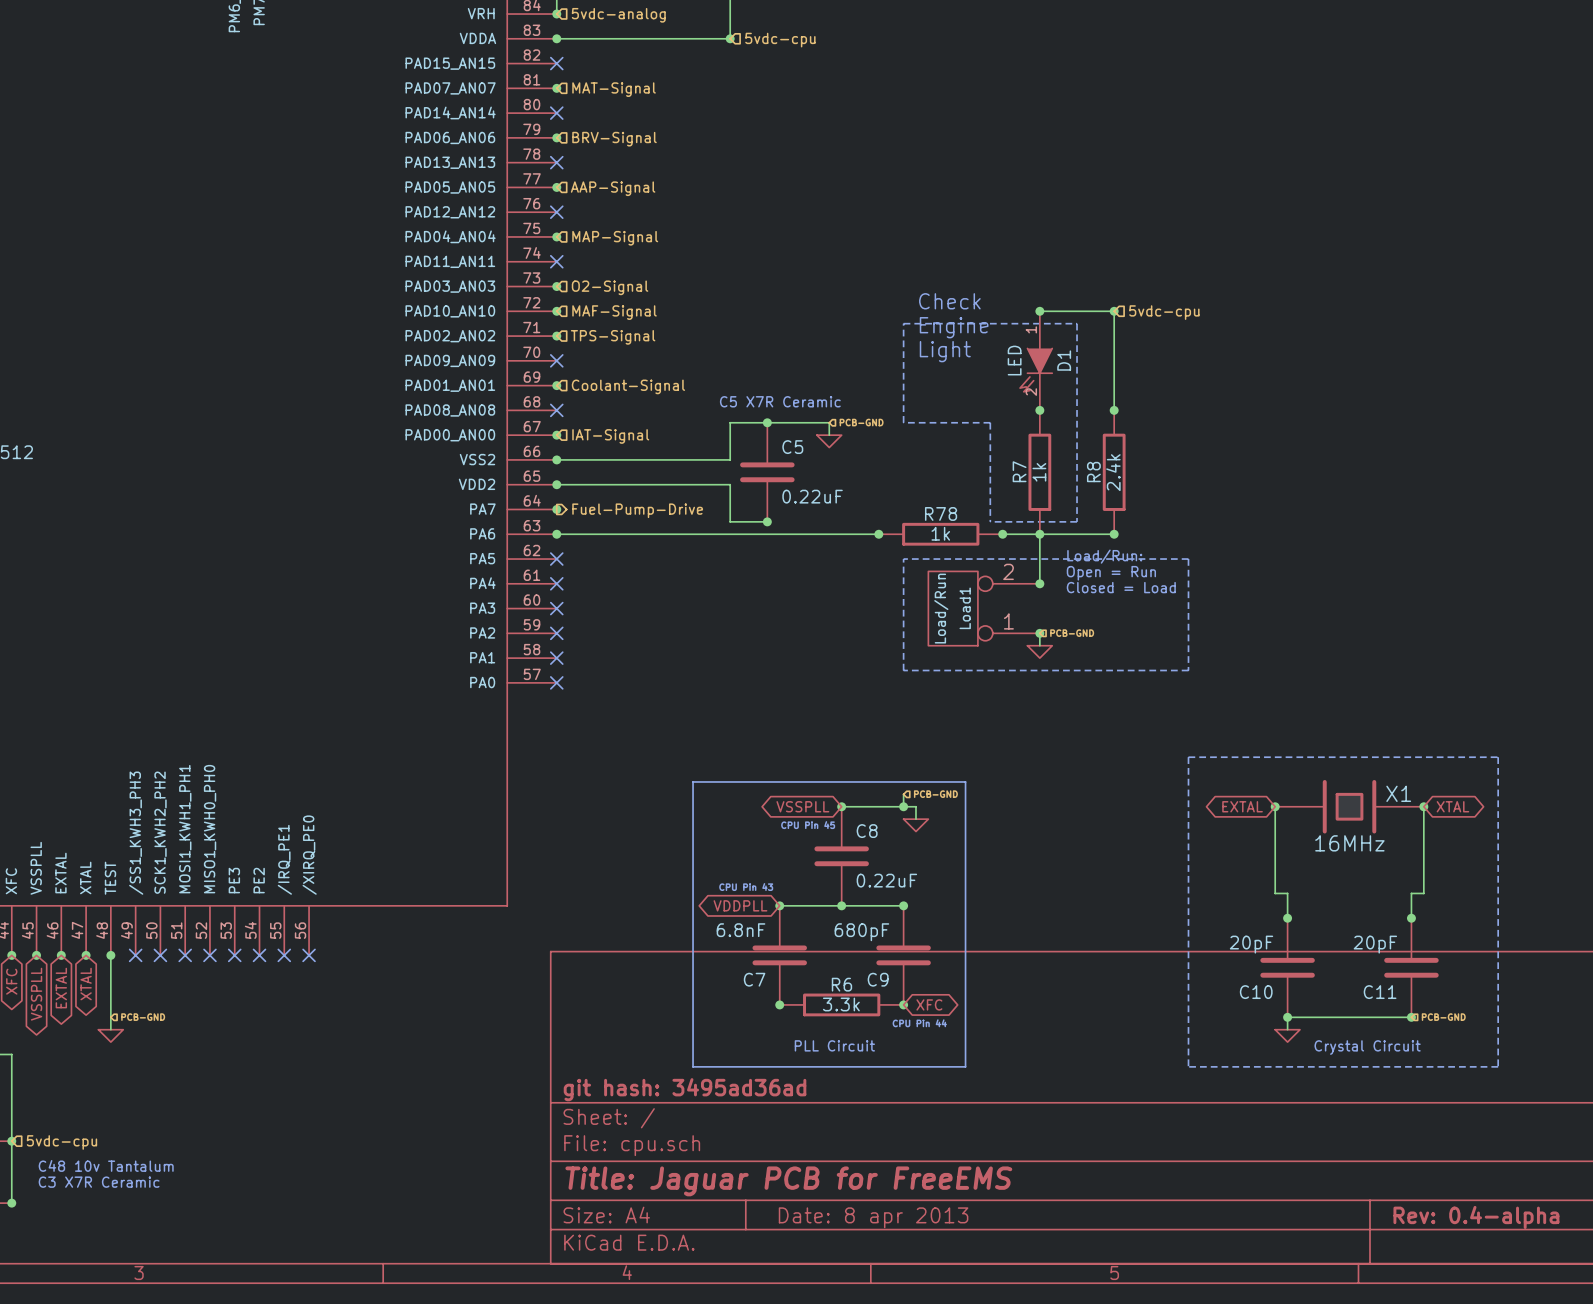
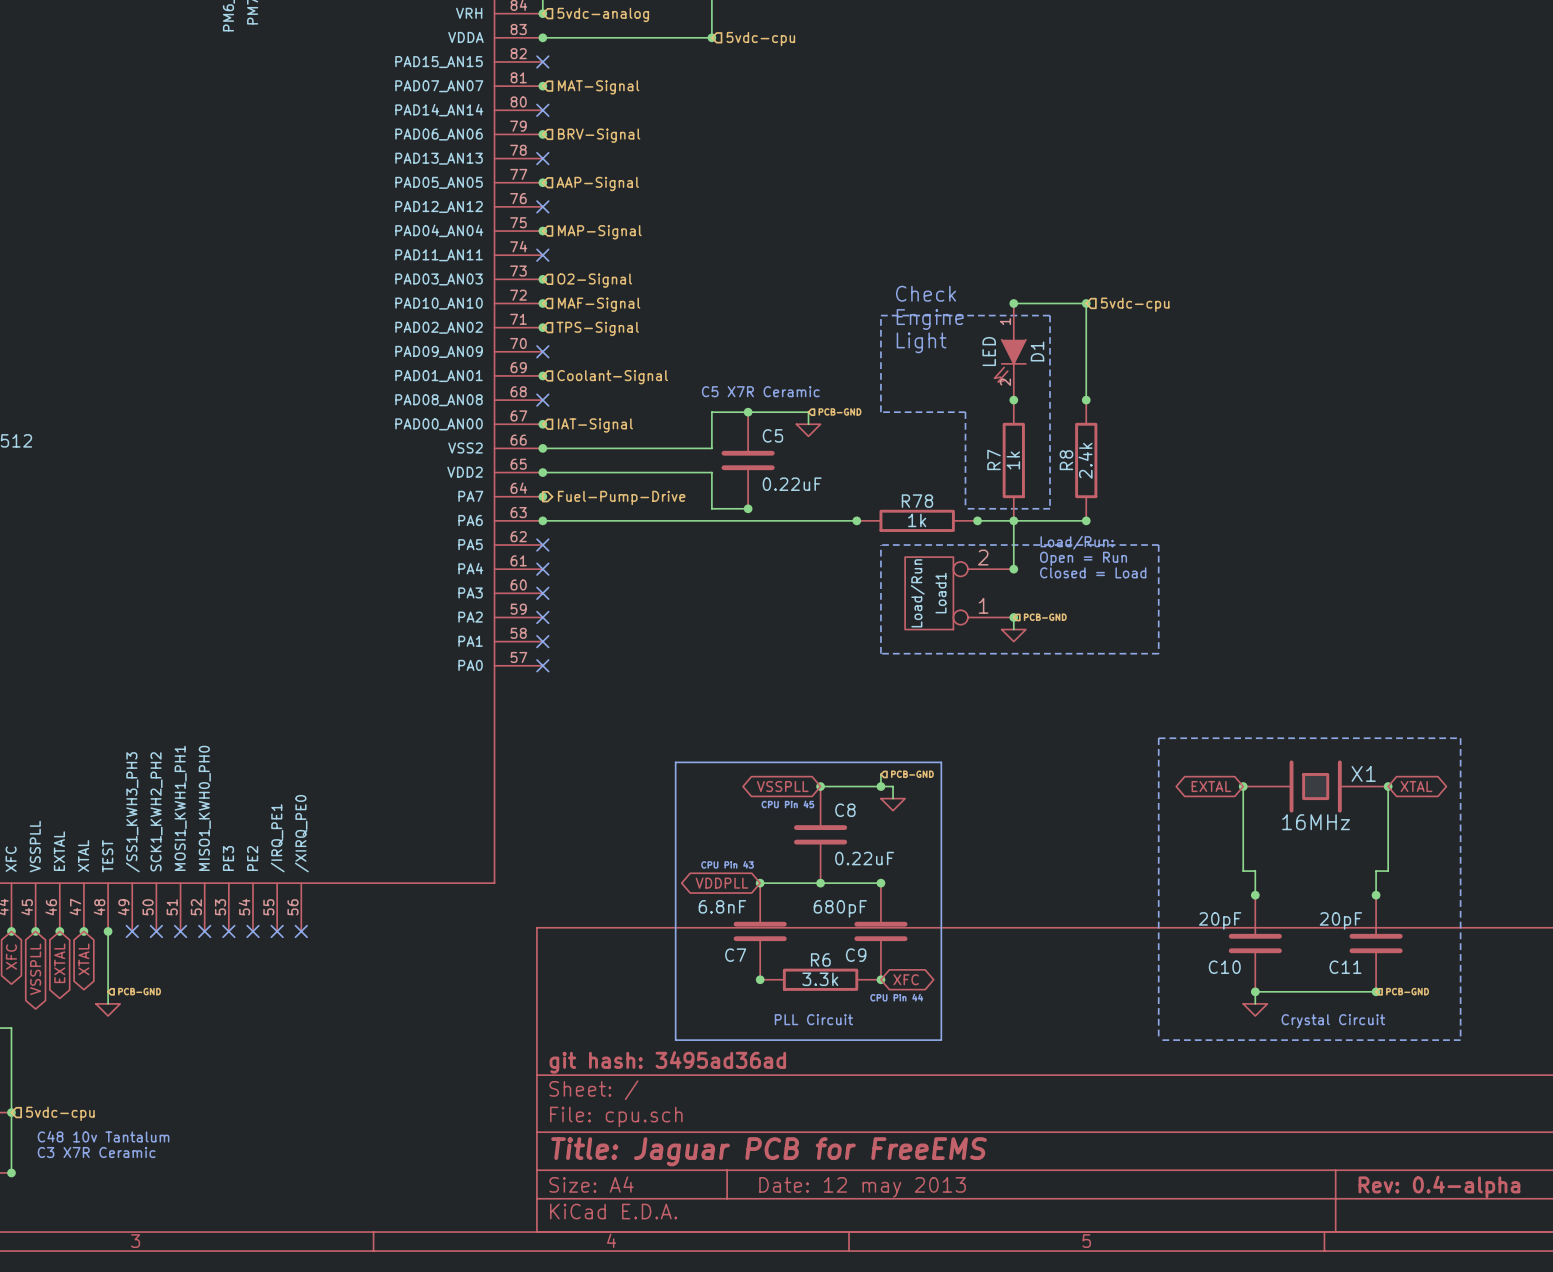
title block: Date: 8 apr 2013 (873, 1217) -> Date: 12 may 2013 (862, 1187)

